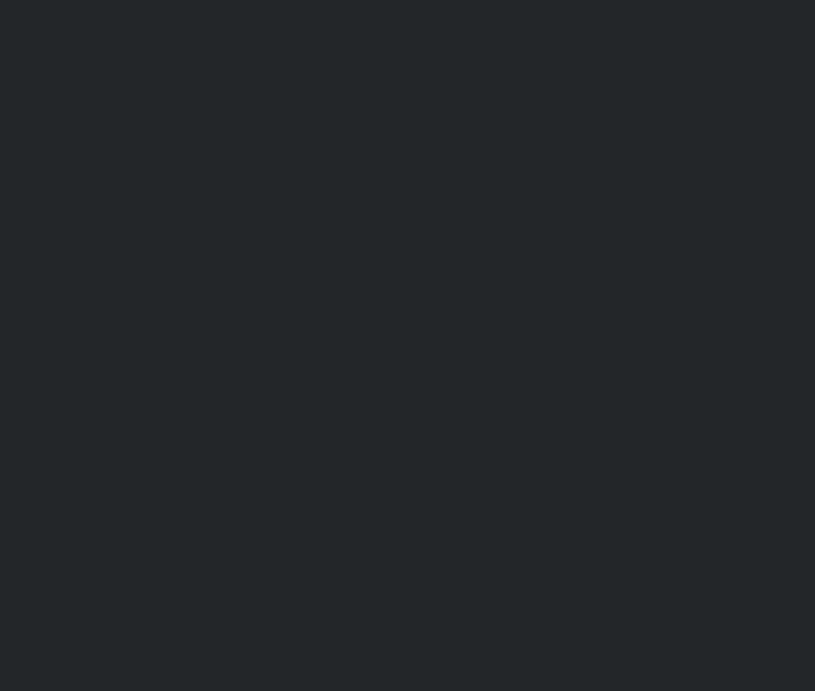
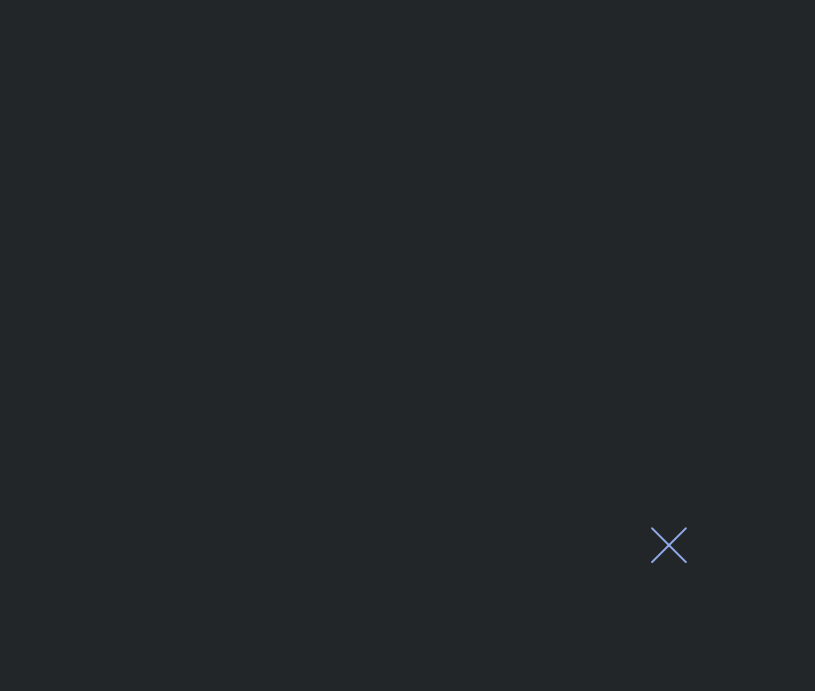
no-connect mark: none -> (668, 545)

